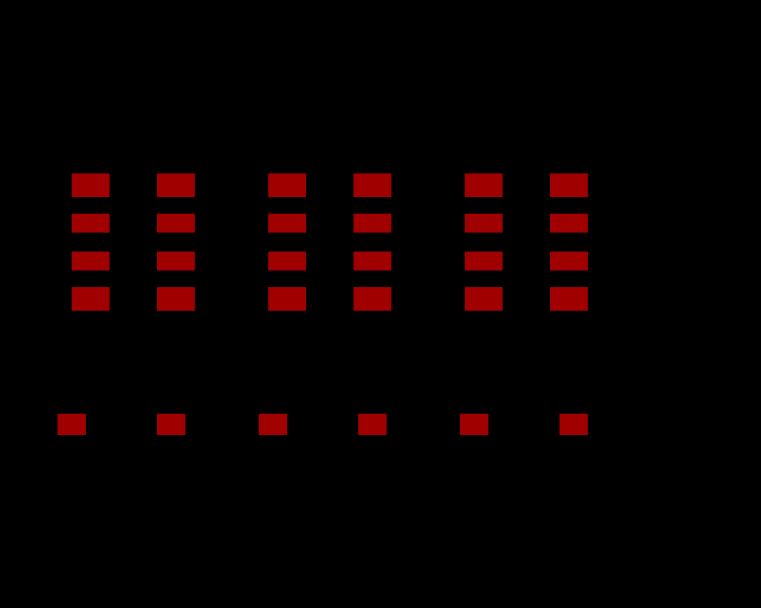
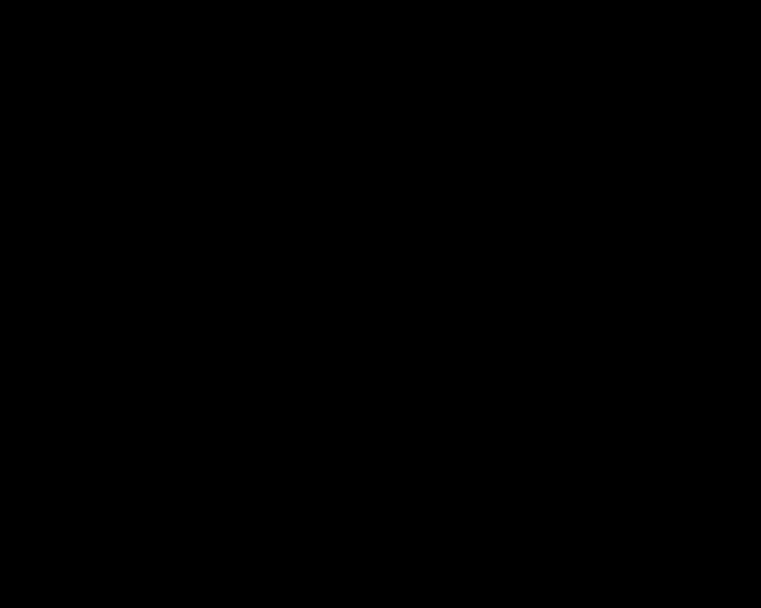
part: (133, 242) -> none
part: (329, 242) -> none
part: (526, 242) -> none
part: (121, 424) -> none
part: (322, 424) -> none
part: (523, 424) -> none

